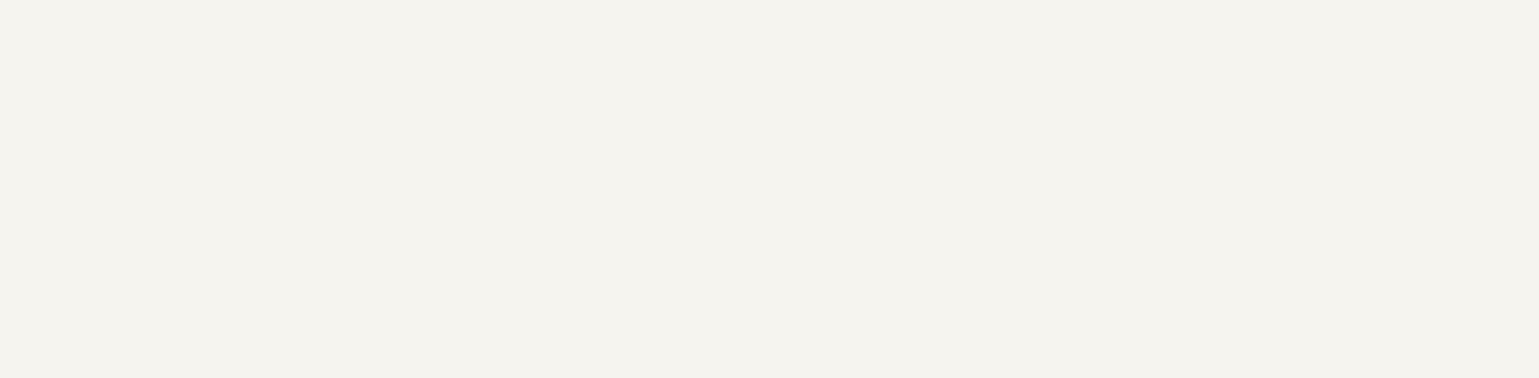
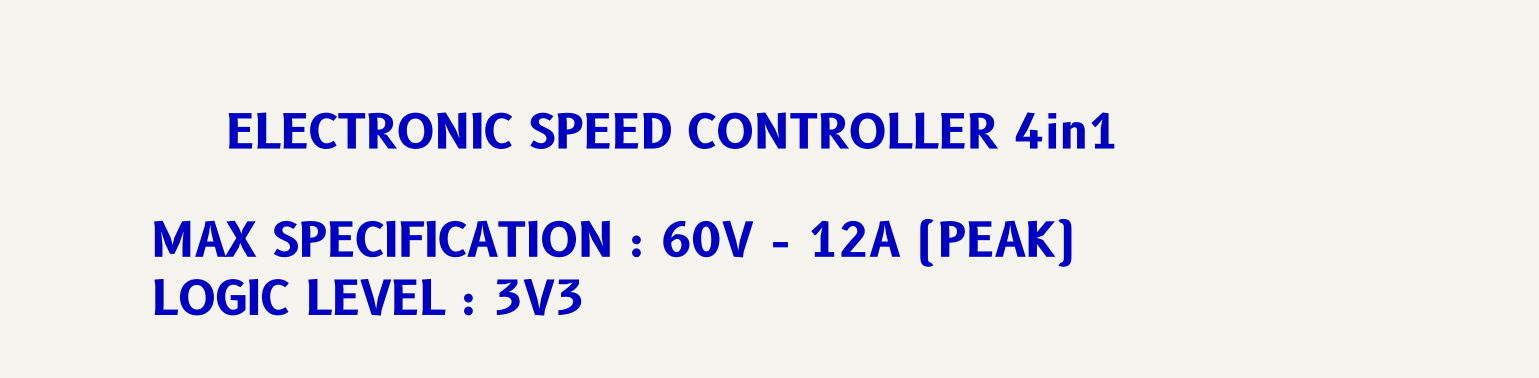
text: none -> ELECTRONIC SPEED CONTROLLER 4in1 (671, 130)
text: none -> MAX SPECIFICATION : 60V - 12A (PEAK) (612, 242)
text: none -> LOGIC LEVEL : 3V3 (367, 297)

